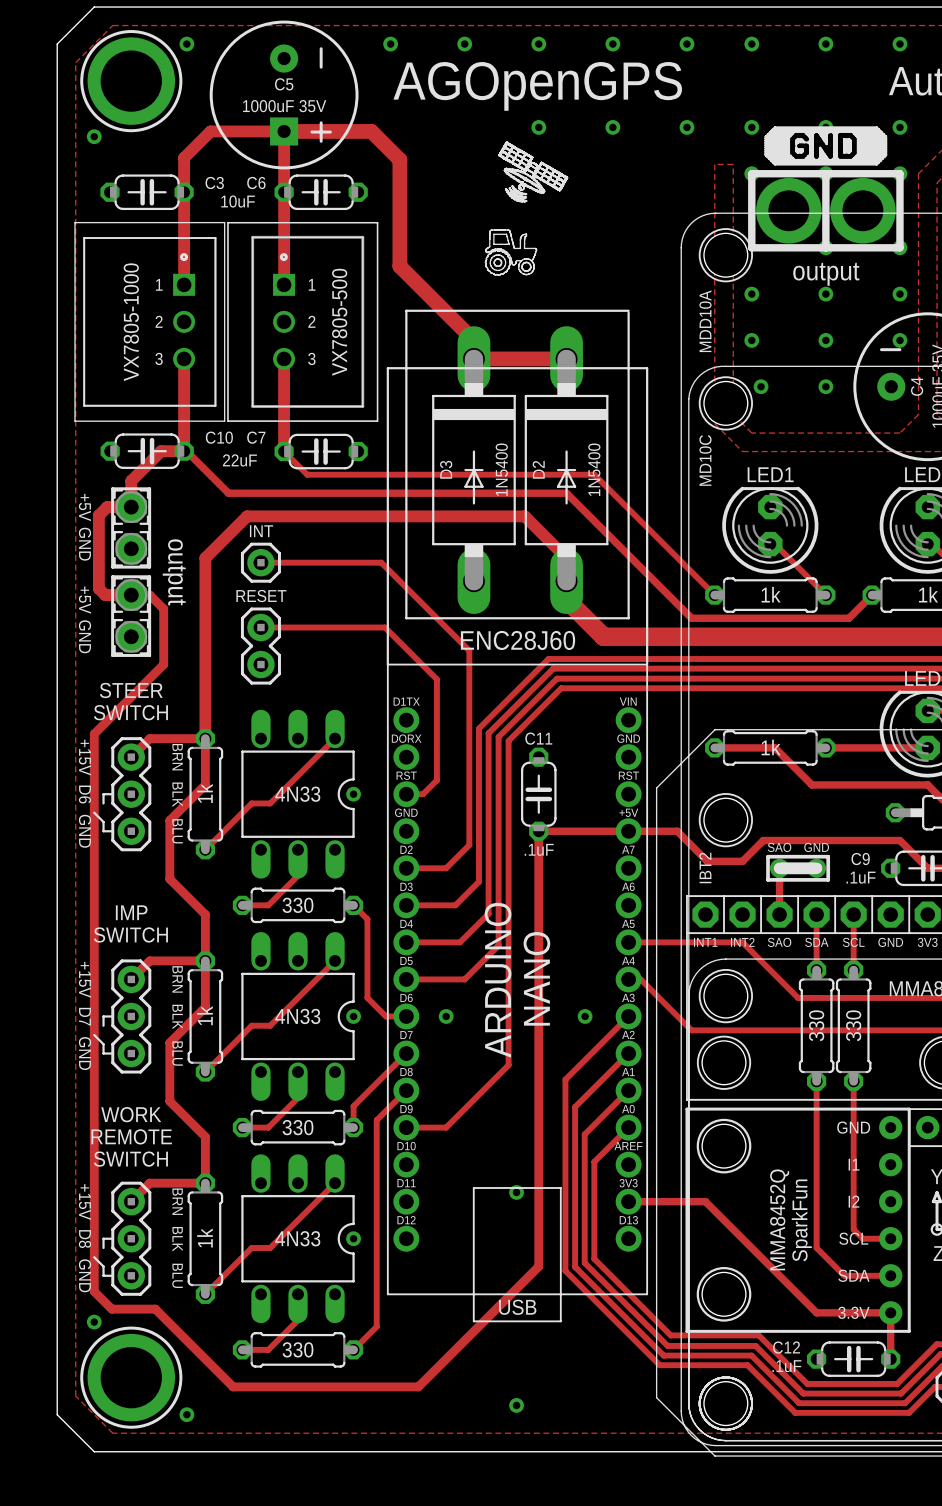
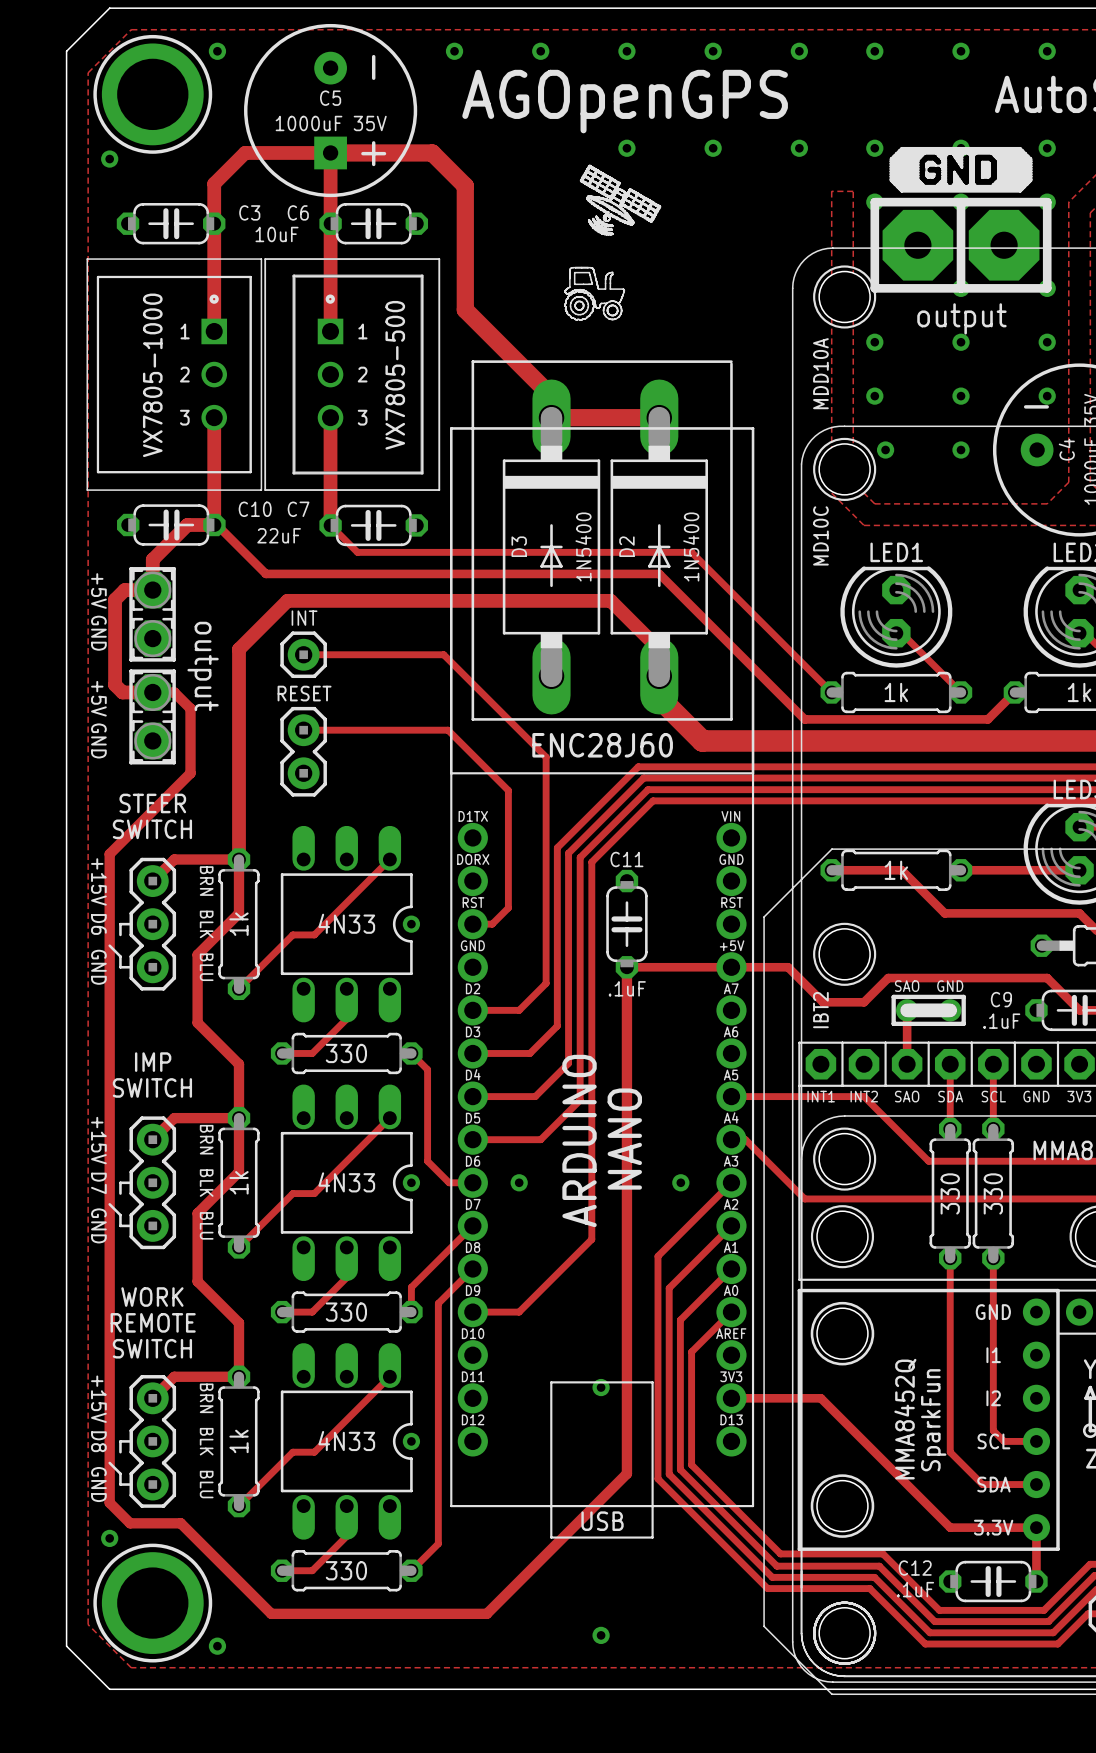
via: (788, 210) -> none
part: none -> (917, 245)
via: (862, 210) -> none
part: none -> (1004, 245)

